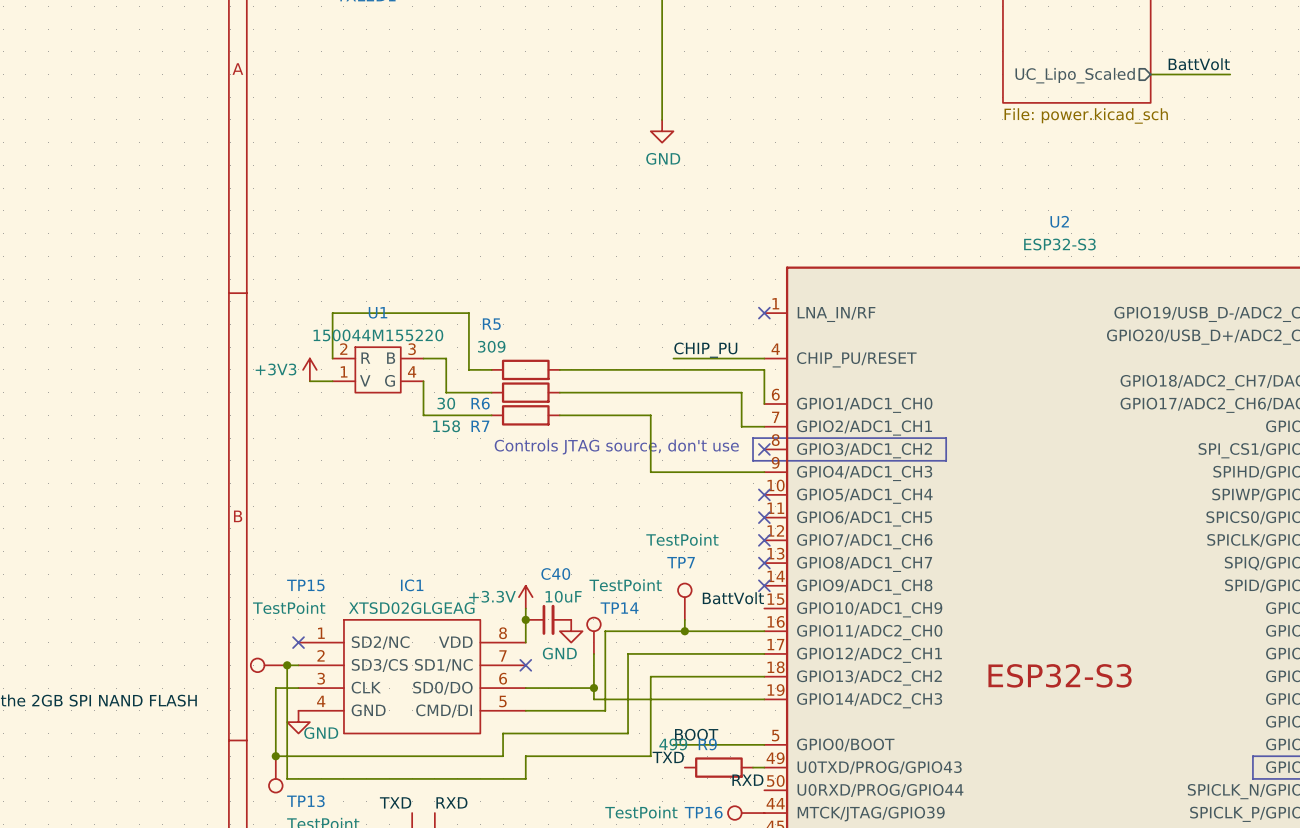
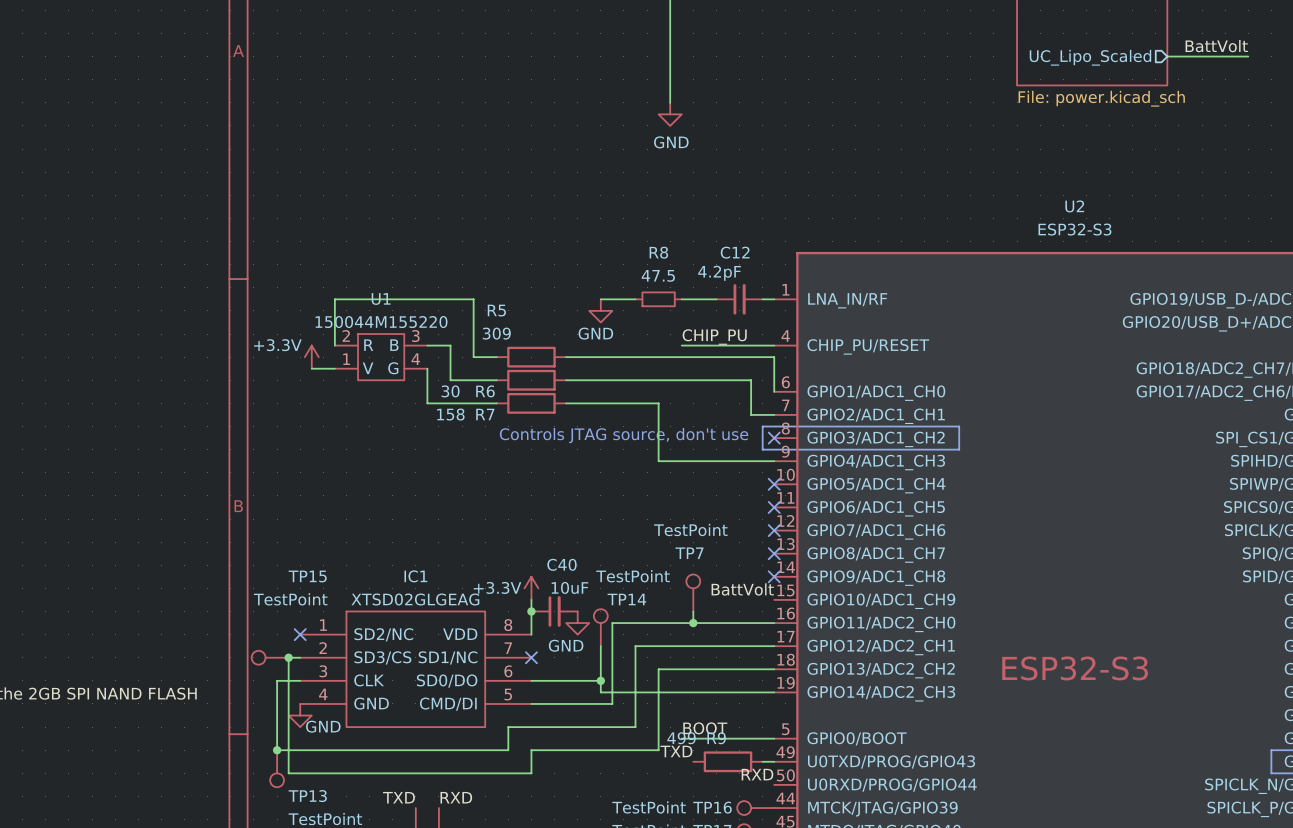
wire: none -> (600, 299) (635, 299)
R8: none -> 47.5 (658, 299)
wire: none -> (681, 299) (716, 299)
C12: none -> 4.2pF (739, 299)
wire: none -> (762, 299) (774, 299)
no-connect mark: (764, 313) -> none
power symbol: none -> GND (600, 310)
power symbol: +3V3 (309, 369) -> +3.3V (311, 357)

